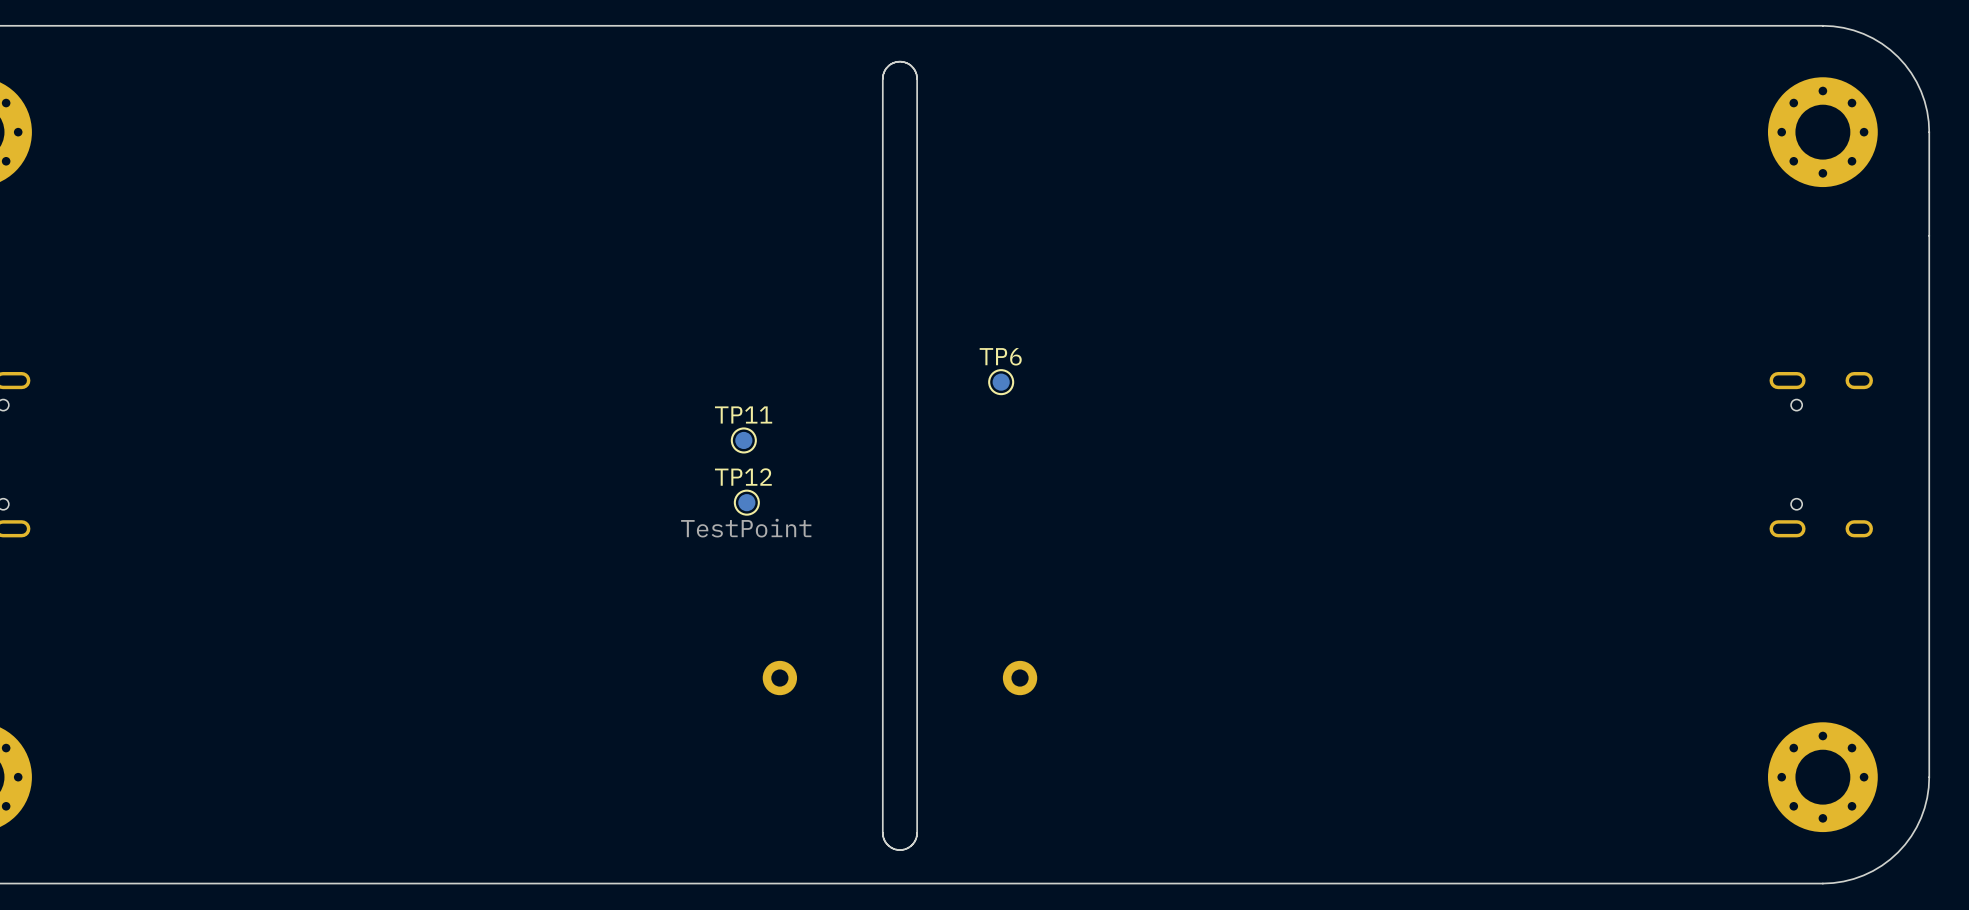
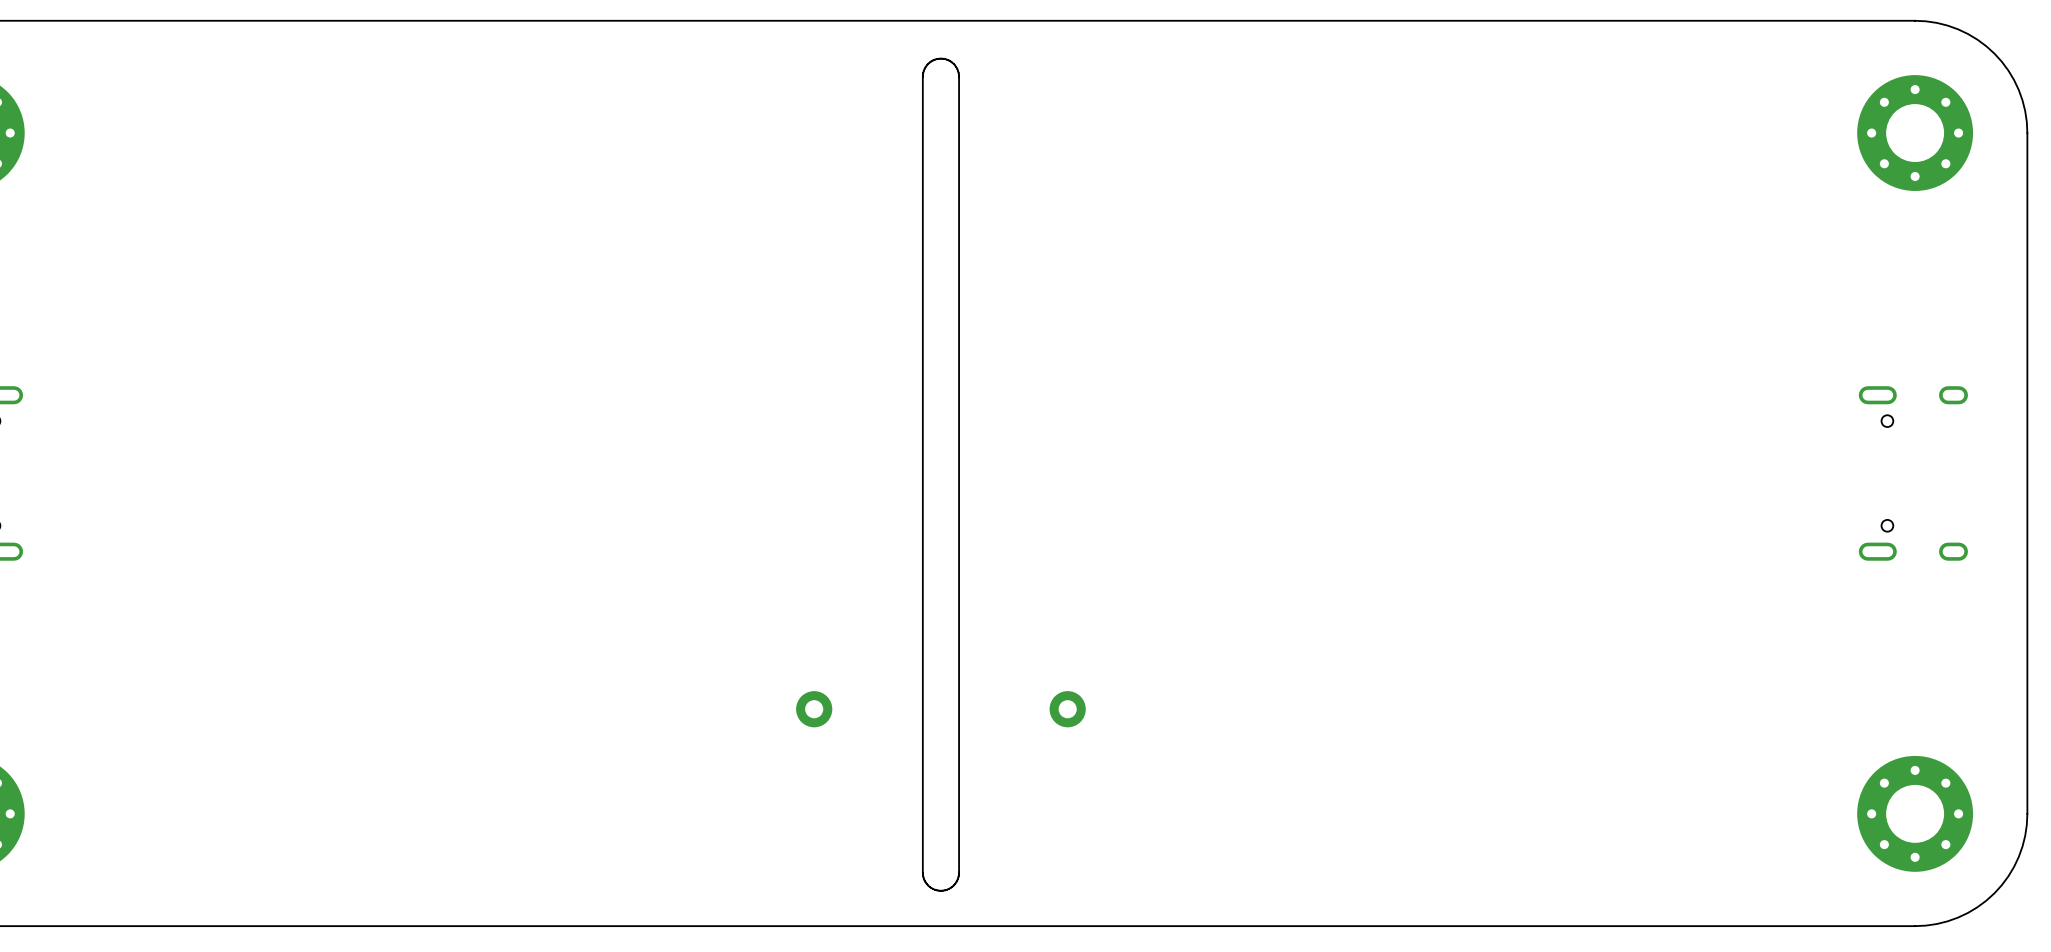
TP6: (1001, 382) -> none
TP11: (743, 440) -> none
TP12: TestPoint (746, 502) -> none

